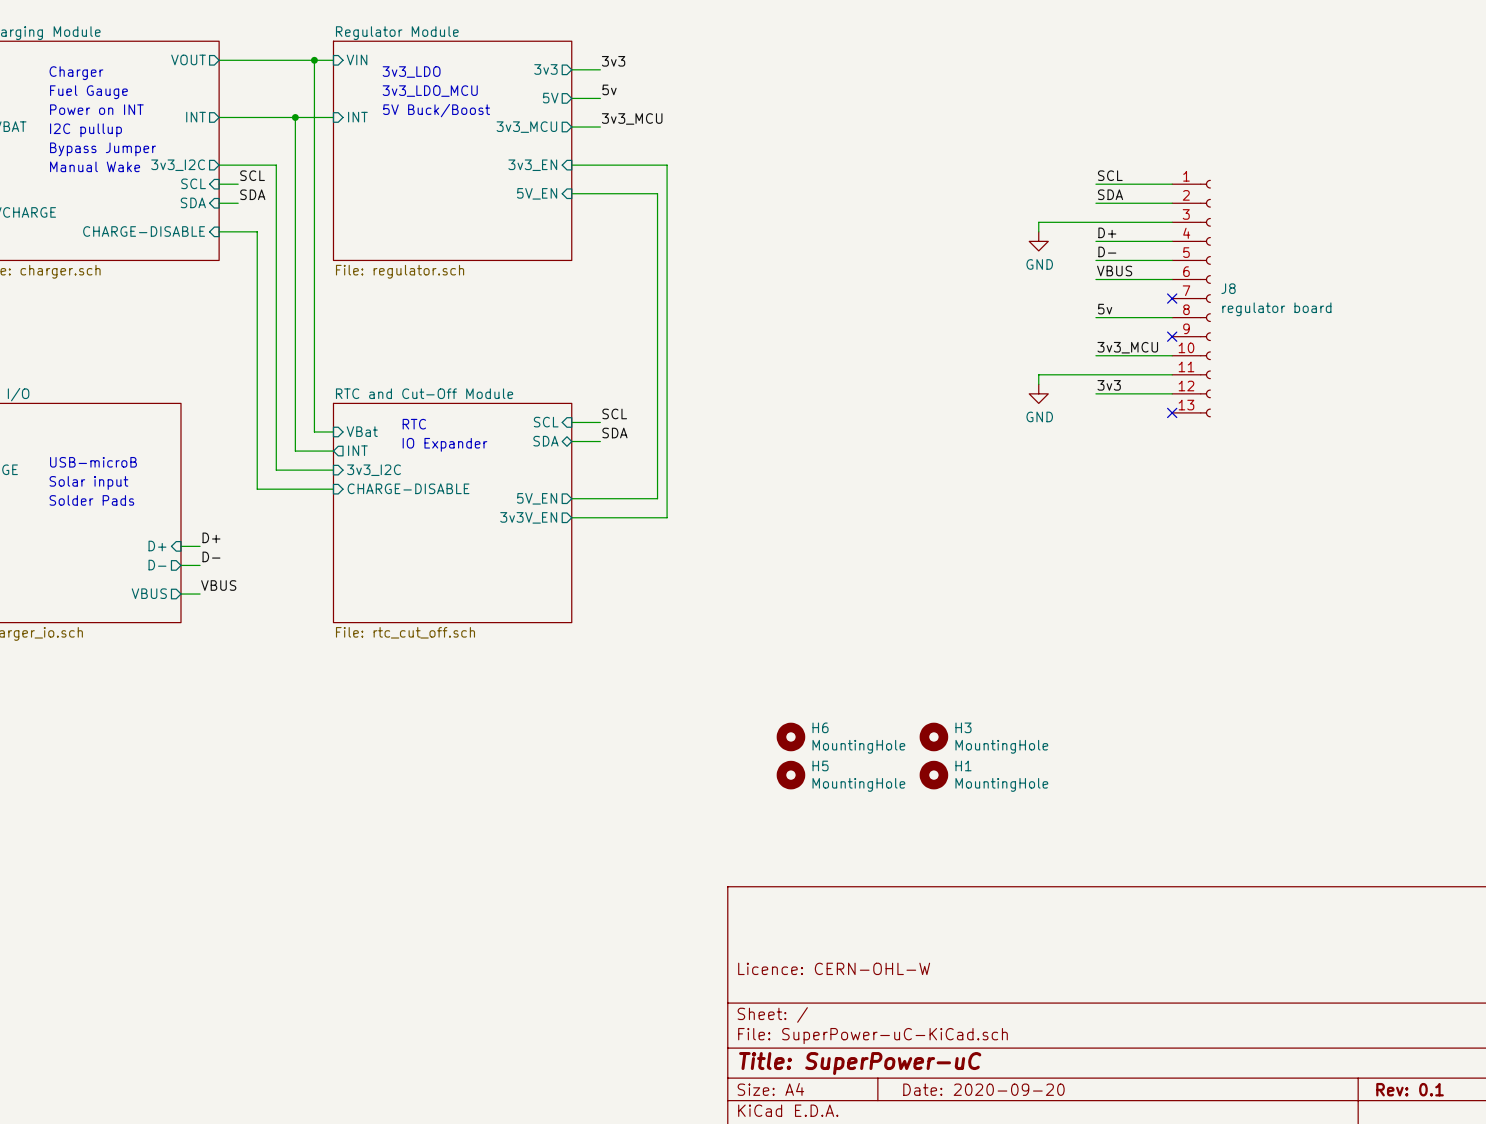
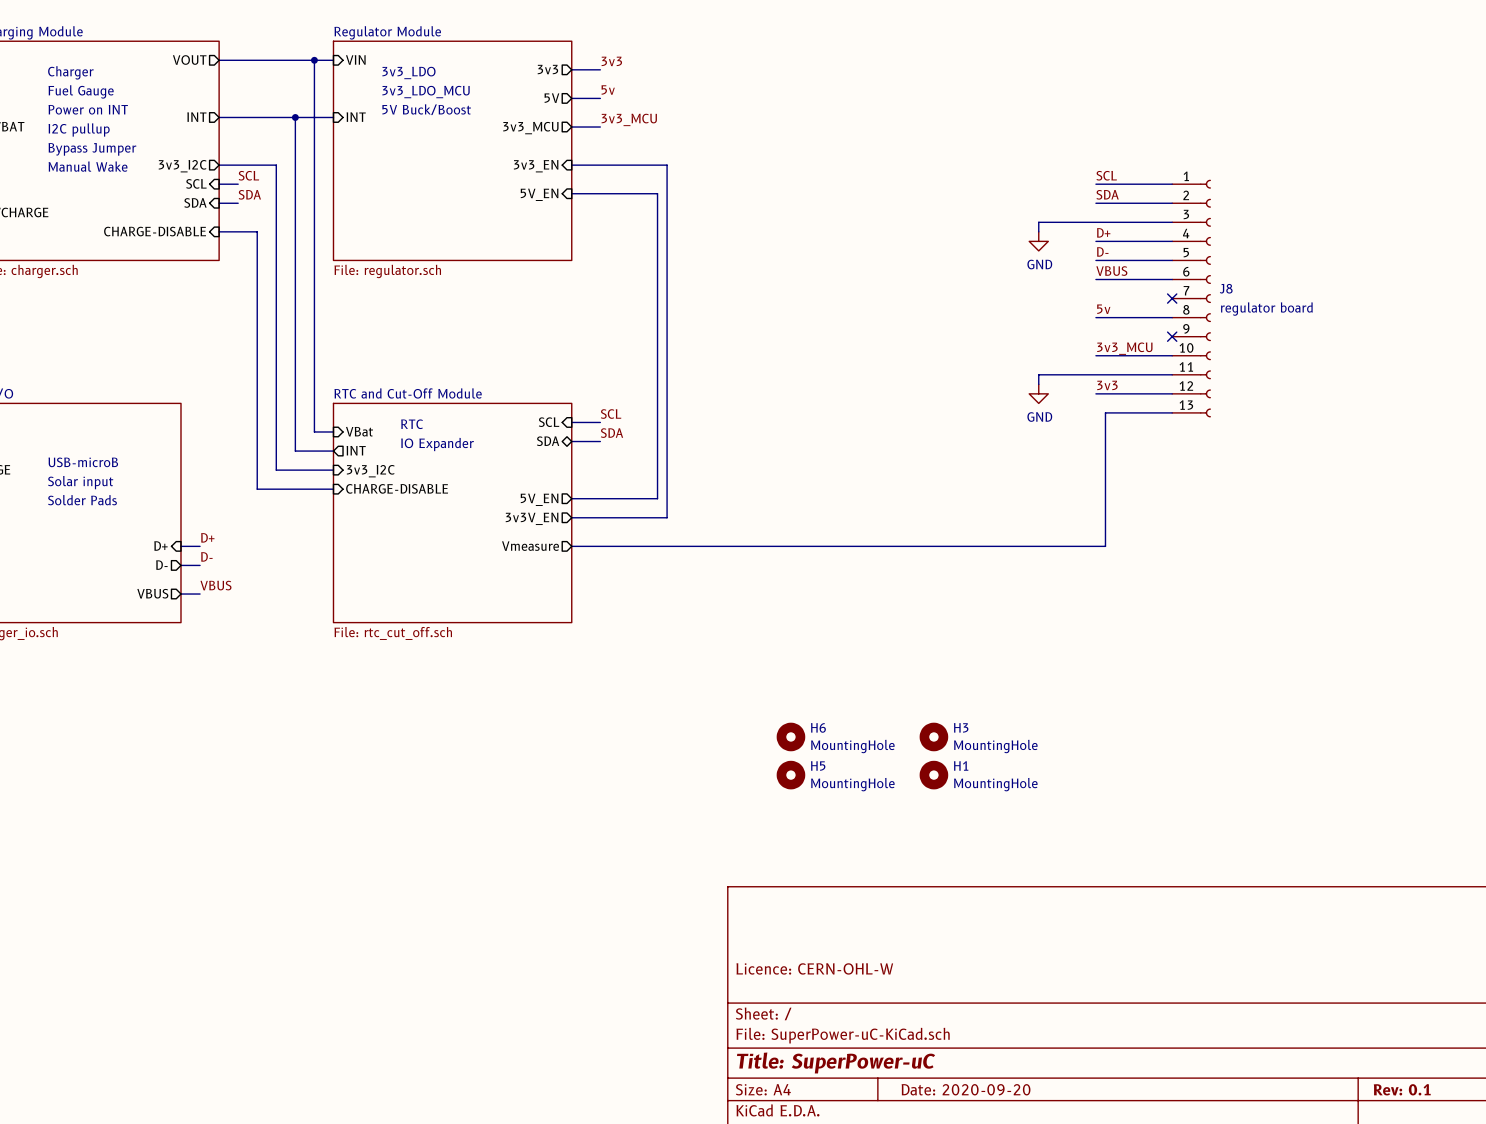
wire: none -> (1172, 412) (1105, 412) (1105, 546) (571, 546)
no-connect mark: (1172, 412) -> none
sheet pin: none -> Vmeasure (530, 546)

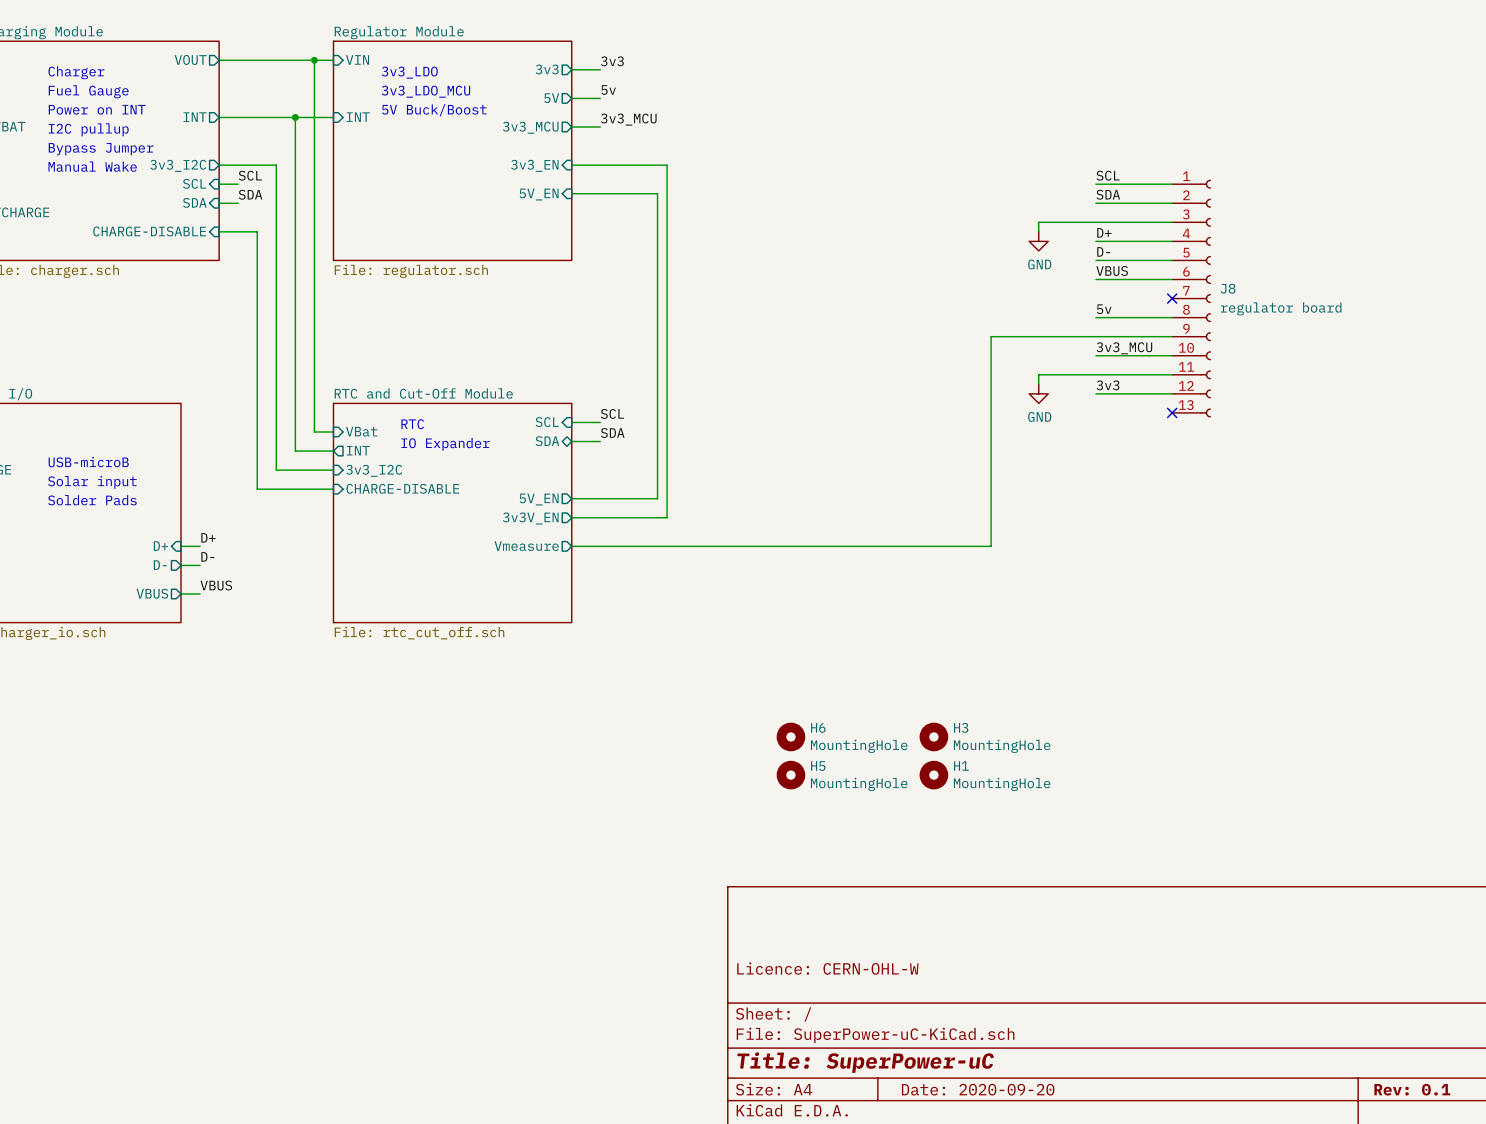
no-connect mark: (1172, 336) -> none
wire: (1172, 412) (1105, 412) (1105, 546) (991, 546) -> (1172, 336) (991, 336) (991, 546)
no-connect mark: none -> (1172, 412)

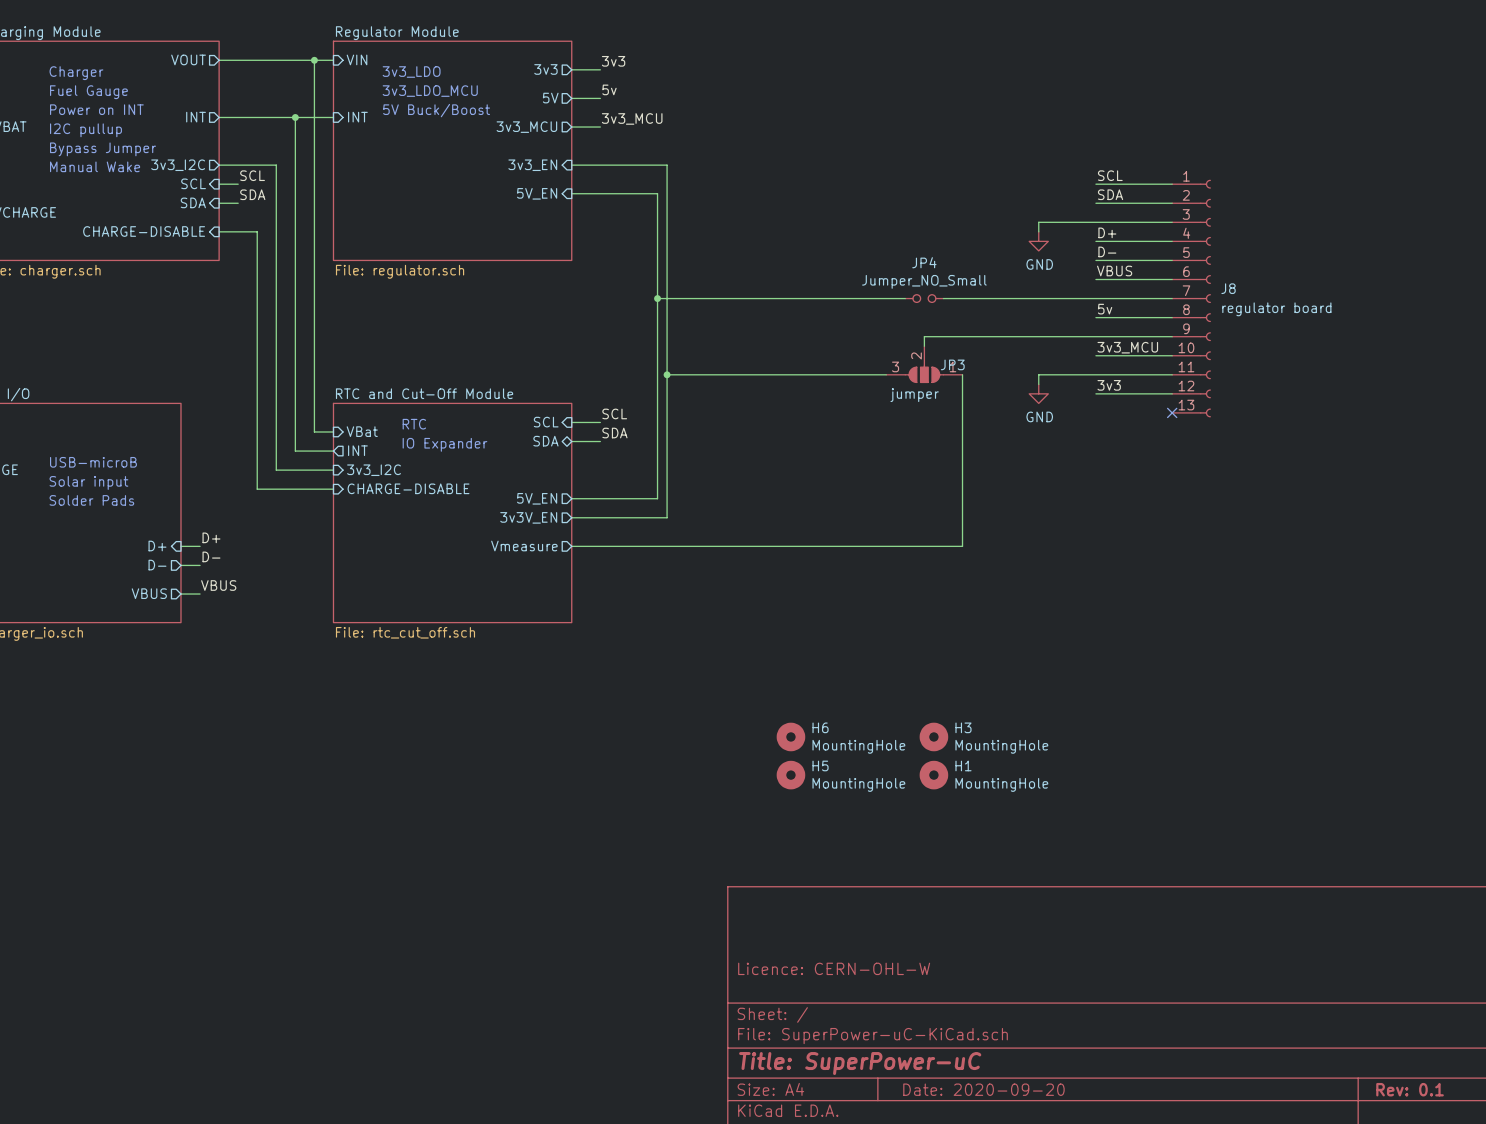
wire: none -> (657, 298) (905, 298)
junction: none -> (657, 298)
JP4: none -> Jumper_NO_Small (924, 298)
wire: none -> (943, 298) (1172, 298)
no-connect mark: (1172, 298) -> none
wire: (991, 336) (991, 546) (962, 546) -> (962, 374) (962, 546)
wire: none -> (991, 336) (924, 336) (924, 346)
JP3: none -> jumper (924, 364)
wire: none -> (667, 374) (886, 374)
junction: none -> (667, 374)

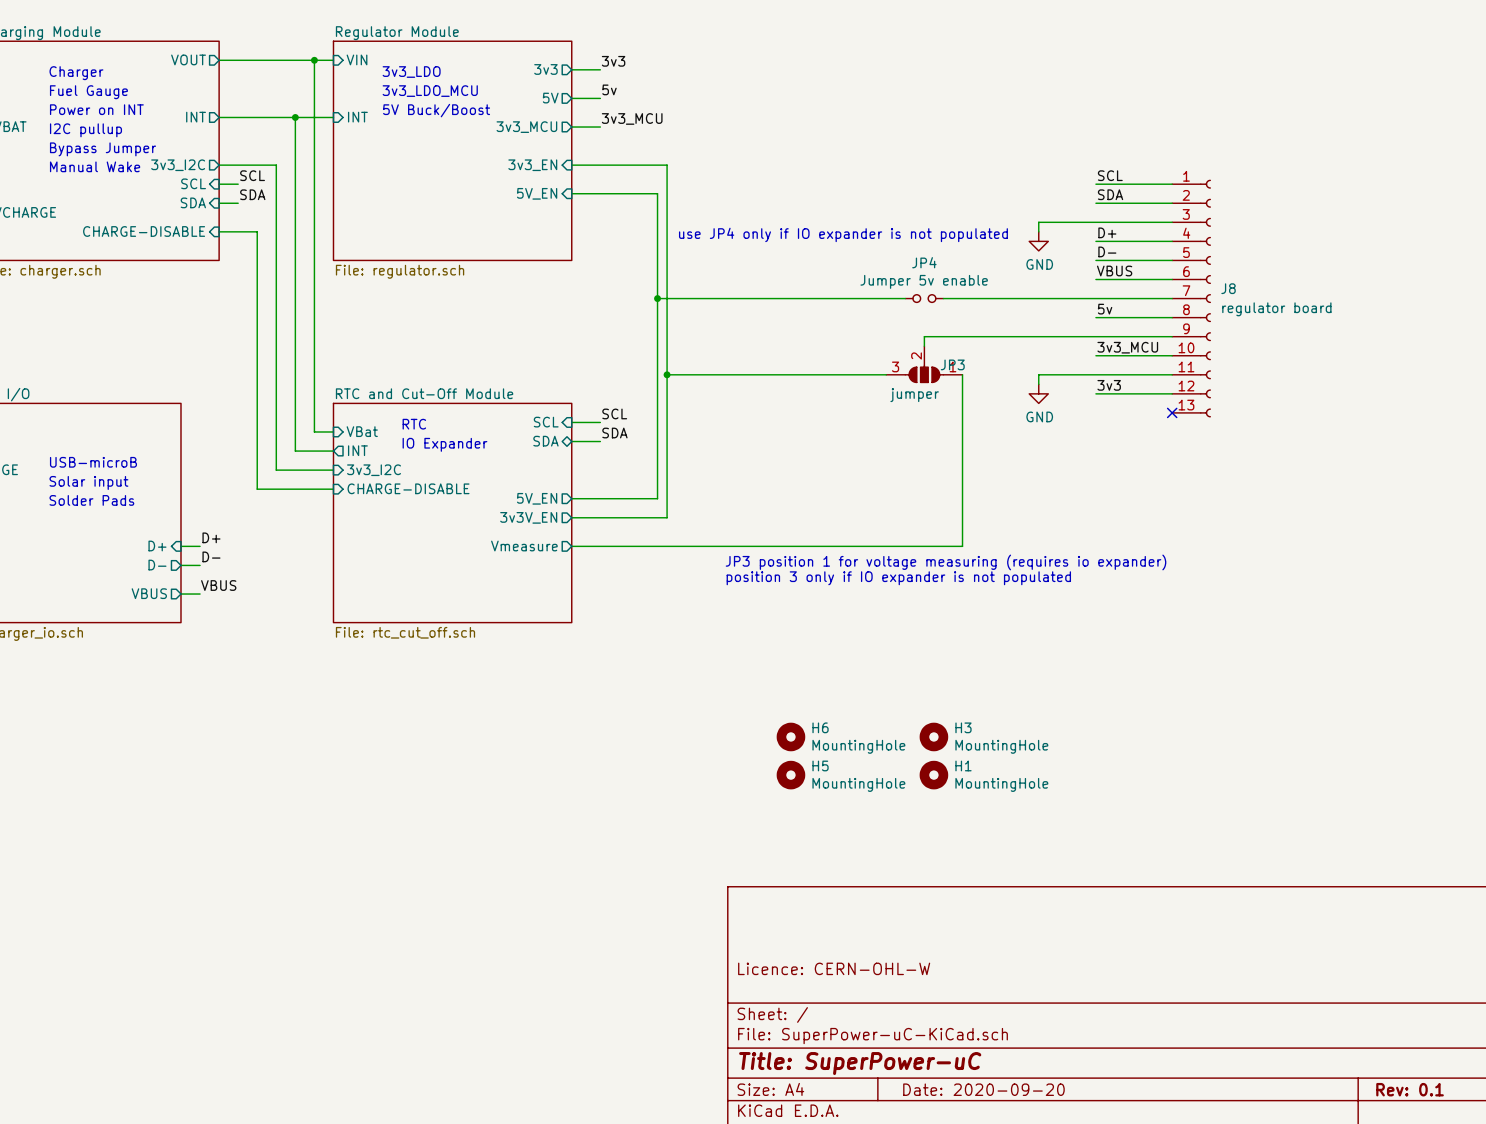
text: none -> use JP4 only if IO expander is not populated (843, 234)
JP4 value: Jumper_NO_Small (924, 281) -> Jumper 5v enable (924, 281)
text: none -> JP3 position 1 for voltage measuring (requires io expander) (946, 562)
text: none -> position 3 only if IO expander is not populated (898, 578)

